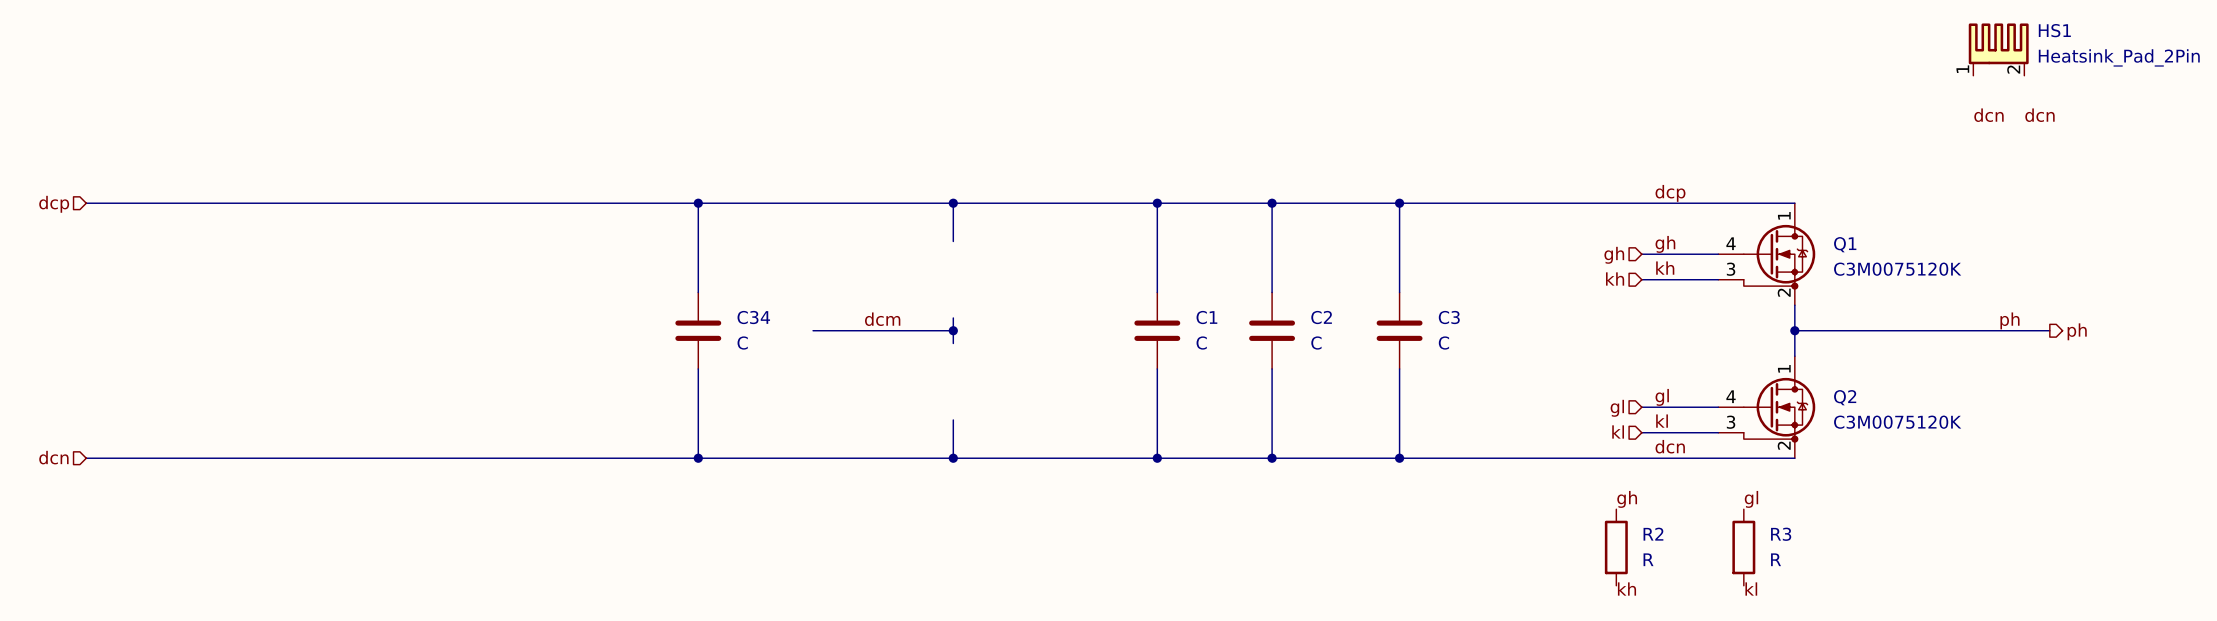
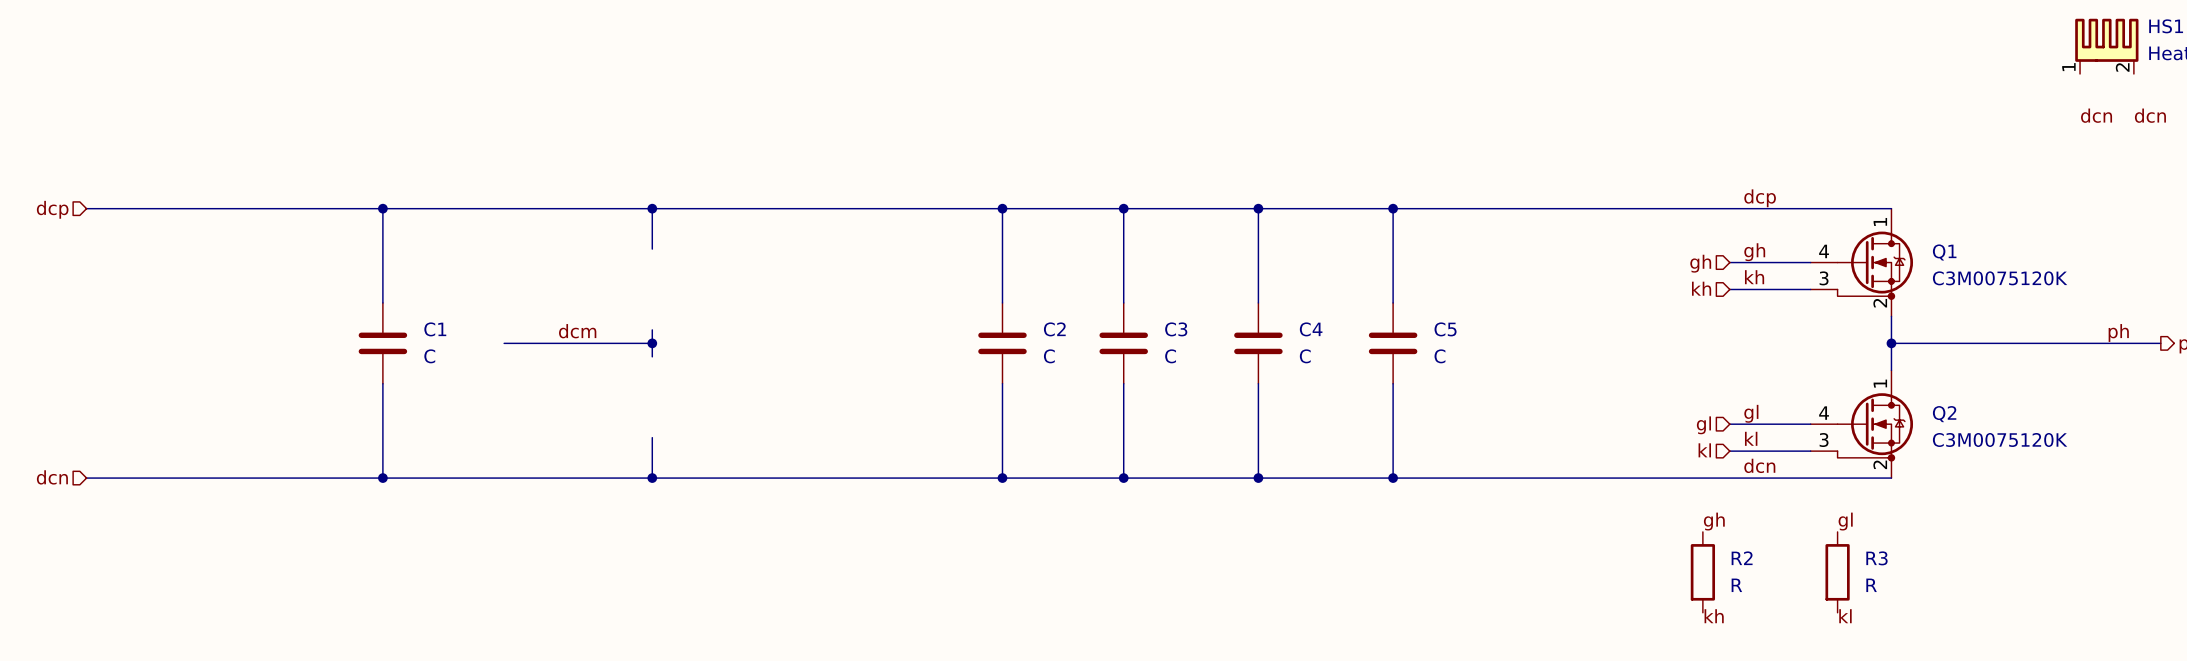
wire: none -> (382, 208) (382, 302)
junction: none -> (382, 208)
wire: none -> (652, 208) (652, 249)
junction: none -> (652, 208)
wire: (698, 203) (698, 292) -> none
junction: (698, 203) -> none
junction: none -> (1123, 208)
wire: (1157, 203) (1157, 292) -> (1123, 208) (1123, 302)
junction: (1157, 203) -> none
junction: none -> (1258, 208)
wire: (1272, 203) (1272, 292) -> (1258, 208) (1258, 302)
junction: (1272, 203) -> none
junction: none -> (1393, 208)
wire: (1399, 203) (1399, 292) -> (1393, 208) (1393, 302)
junction: (1399, 203) -> none
wire: none -> (1002, 249) (1002, 302)
wire: none -> (652, 329) (652, 356)
label: none -> dcm (577, 331)
label: dcm (882, 319) -> none
wire: none -> (504, 343) (652, 343)
junction: none -> (652, 343)
C34: C (698, 330) -> none
wire: (813, 330) (953, 330) -> none
junction: (953, 330) -> none
C1 position: (1157, 330) -> (382, 343)
C4: none -> C (1258, 343)
C2 position: (1272, 330) -> (1002, 343)
C5: none -> C (1393, 343)
C3 position: (1399, 330) -> (1123, 343)
wire: none -> (382, 383) (382, 478)
wire: (698, 368) (698, 458) -> none
wire: none -> (1002, 383) (1002, 437)
wire: (1157, 368) (1157, 458) -> (1123, 383) (1123, 478)
wire: (1272, 368) (1272, 458) -> (1258, 383) (1258, 478)
wire: (1399, 368) (1399, 458) -> (1393, 383) (1393, 478)
wire: none -> (652, 437) (652, 478)
junction: none -> (382, 478)
junction: none -> (652, 478)
junction: (698, 458) -> none
junction: none -> (1123, 478)
junction: (1157, 458) -> none
junction: none -> (1258, 478)
junction: (1272, 458) -> none
junction: none -> (1393, 478)
junction: (1399, 458) -> none

